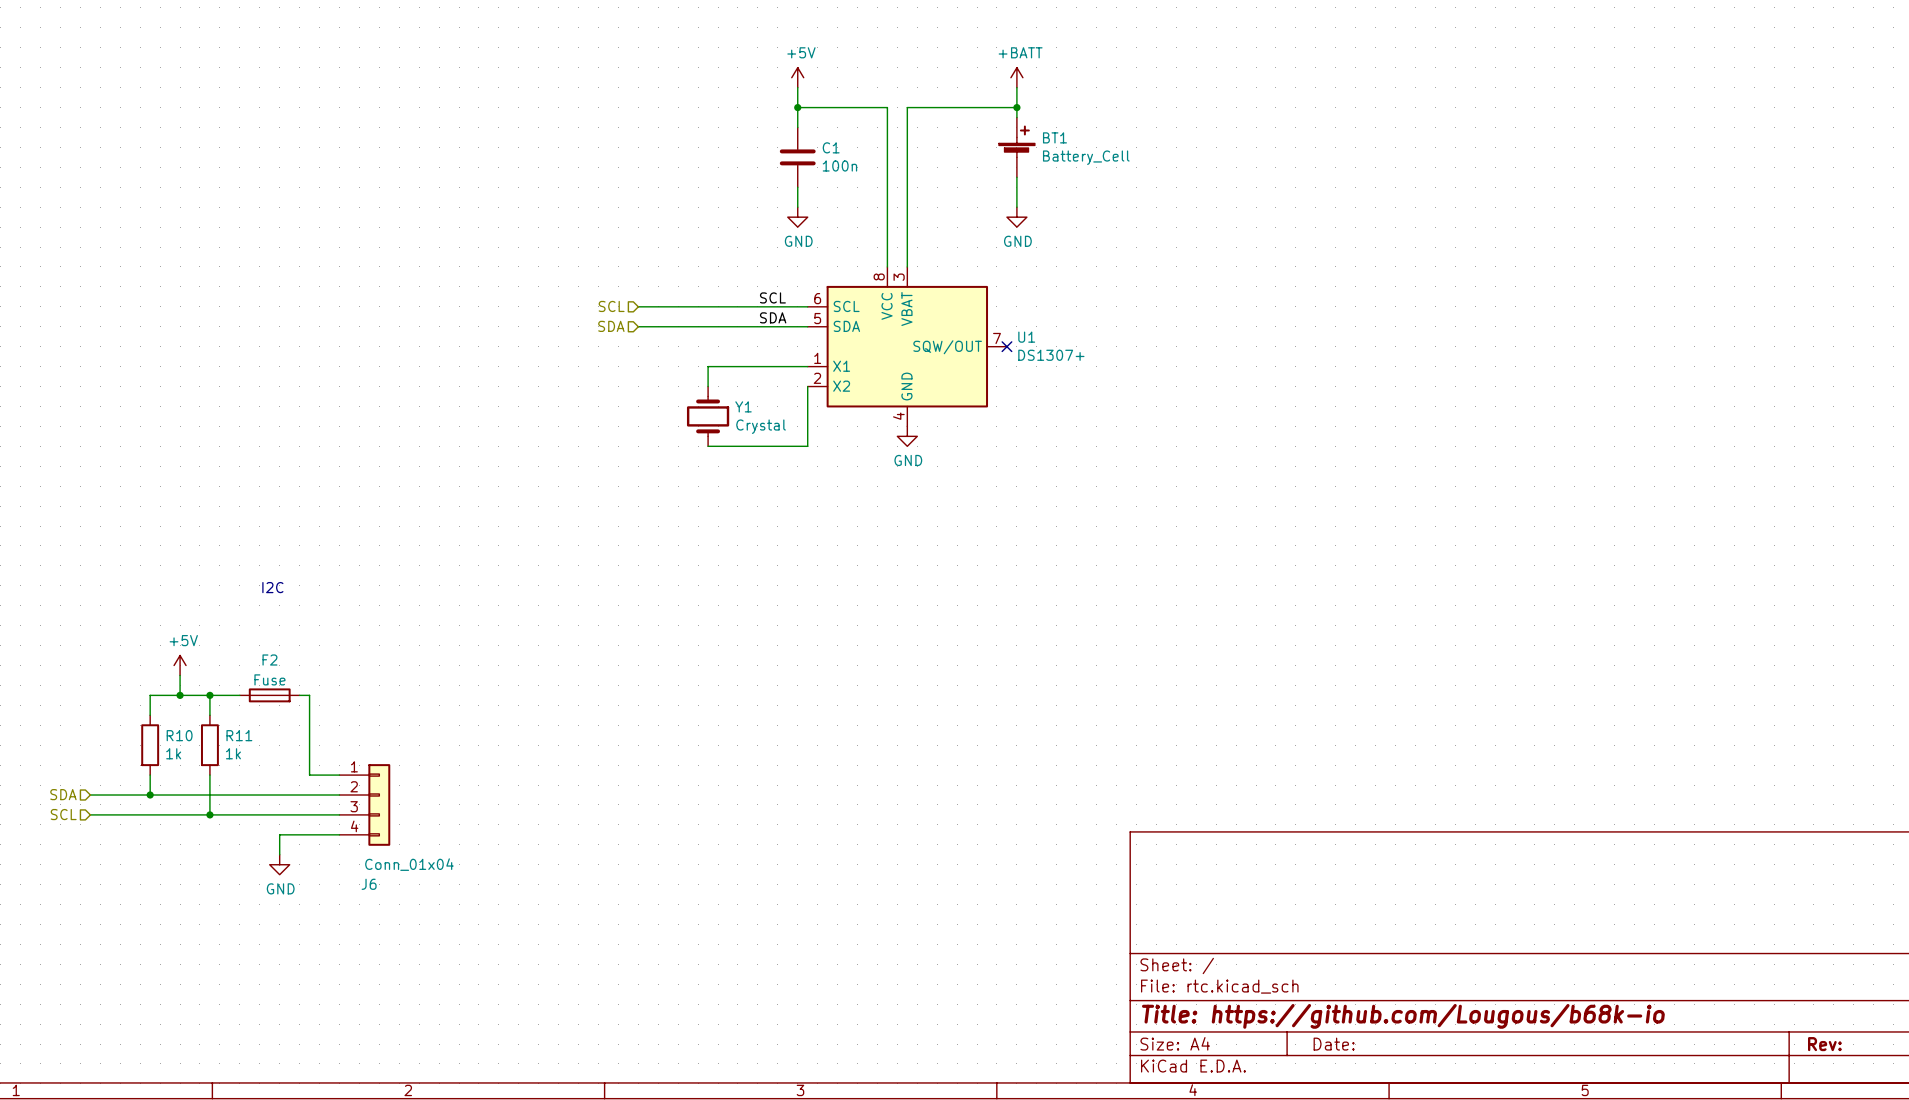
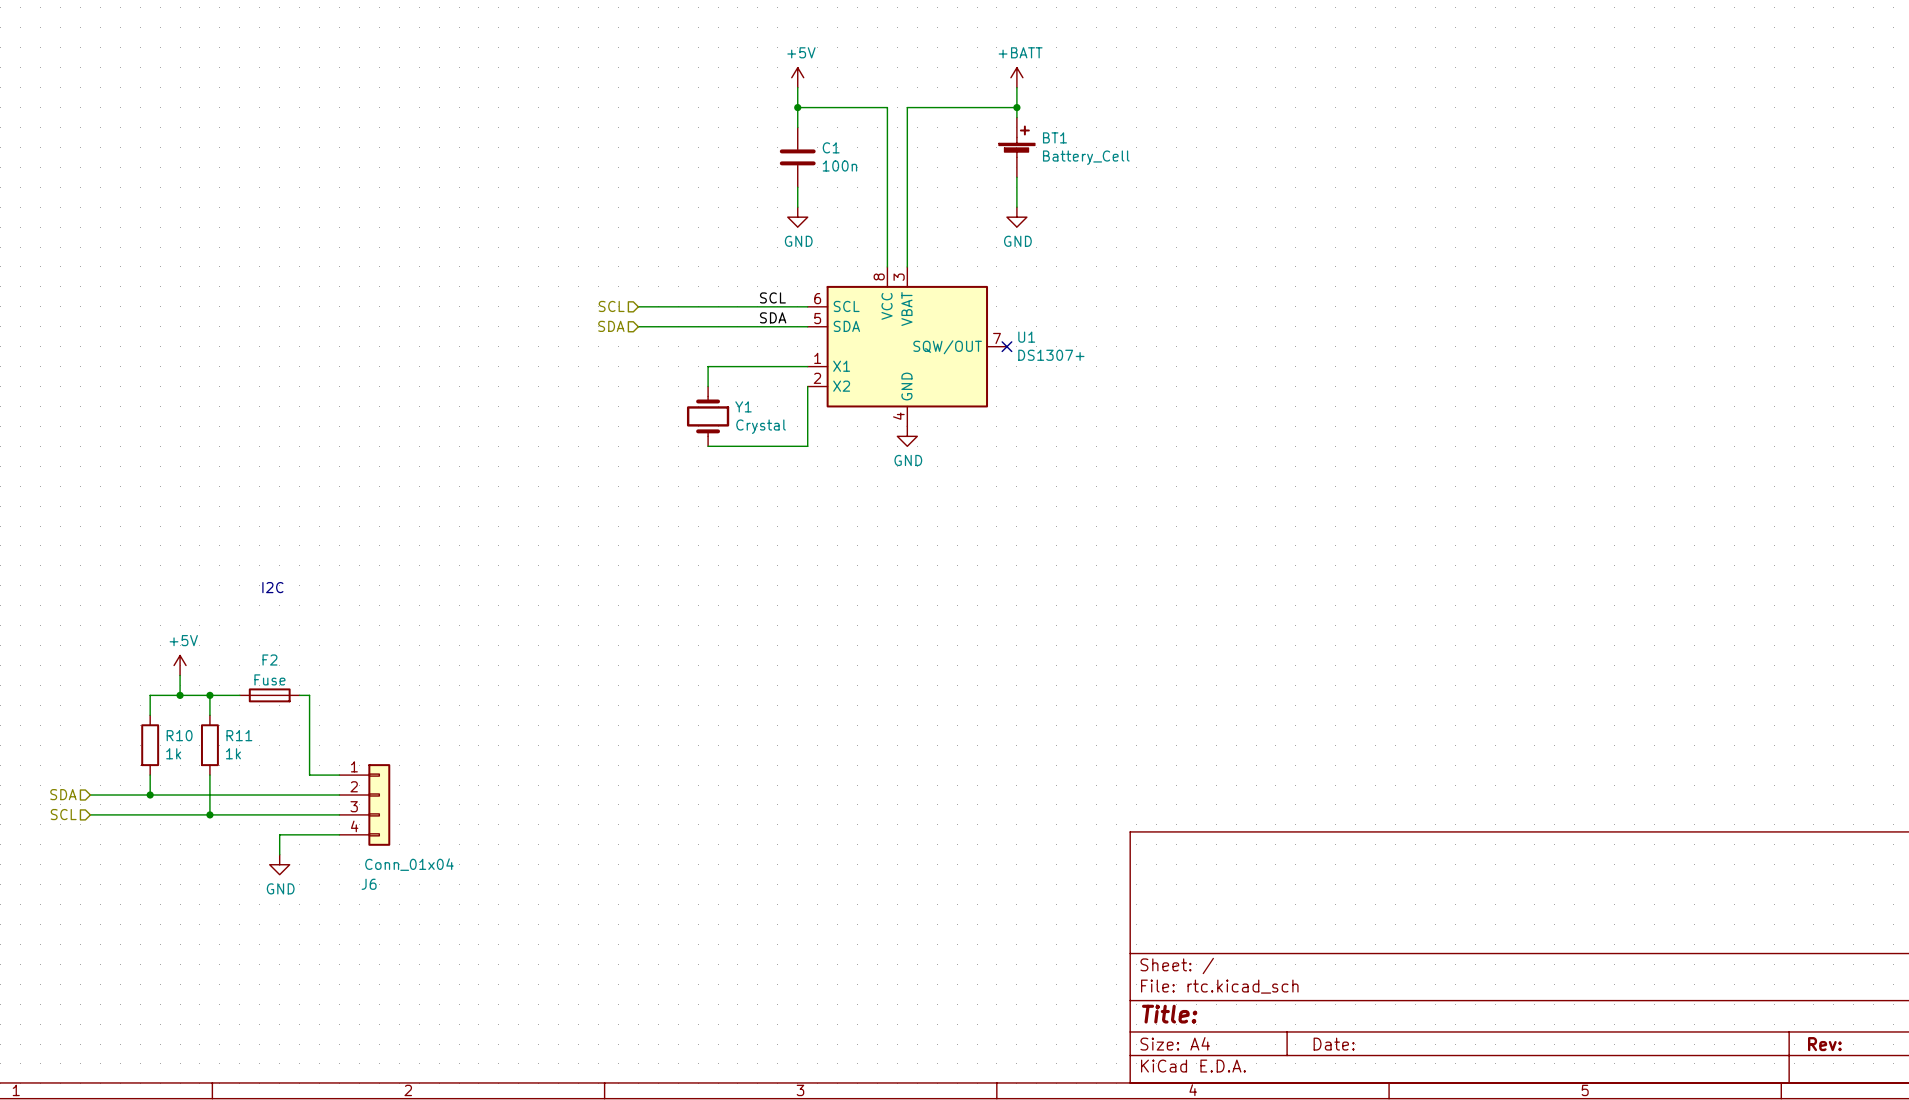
title block: Title: https://github.com/Lougous/b68k-io (1403, 1016) -> Title: (1169, 1014)

